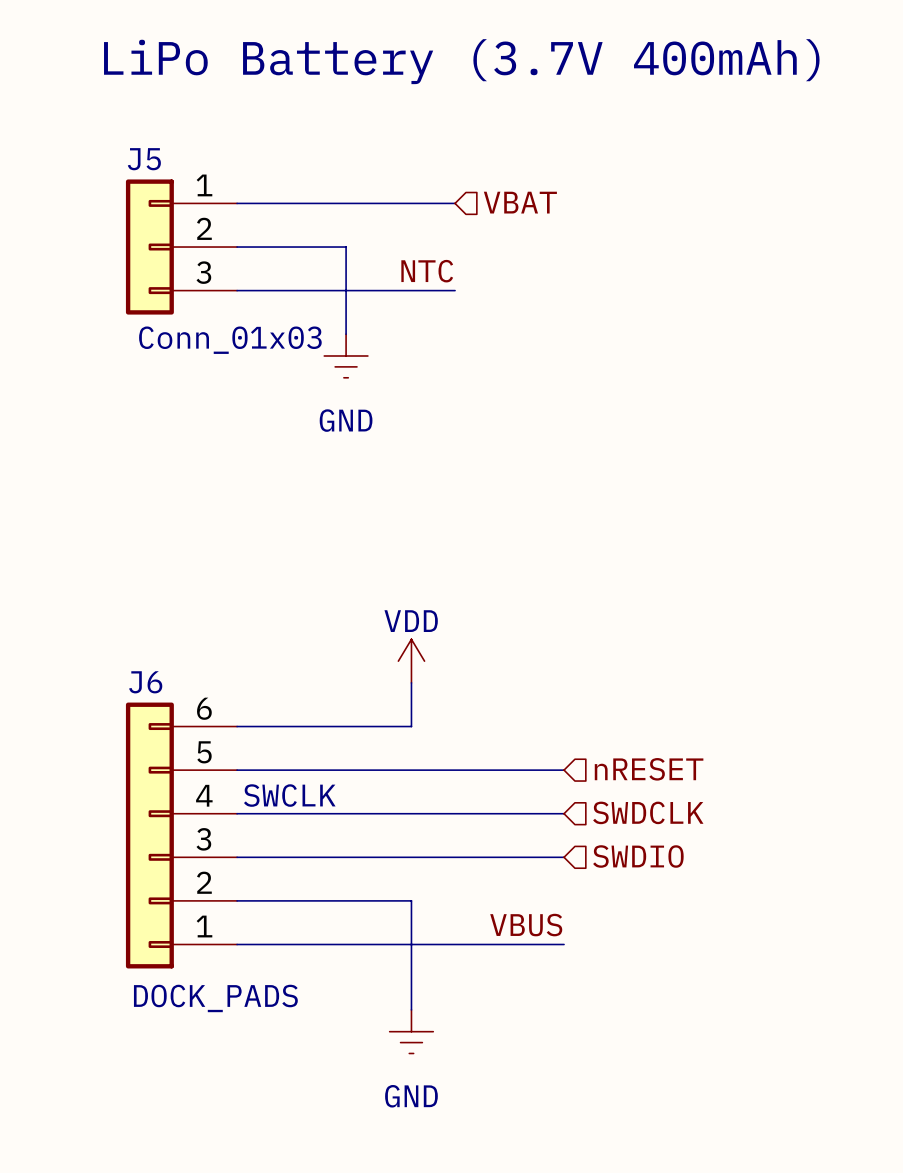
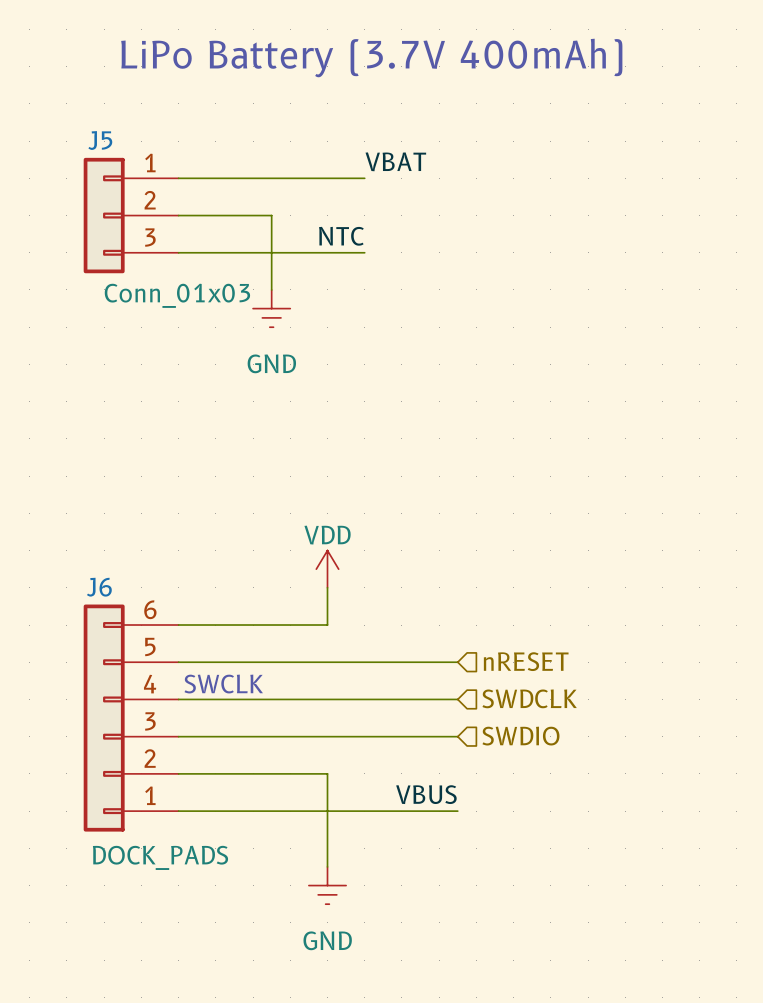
label: none -> VBAT (395, 161)
hierarchical label: VBAT (520, 202) -> none

